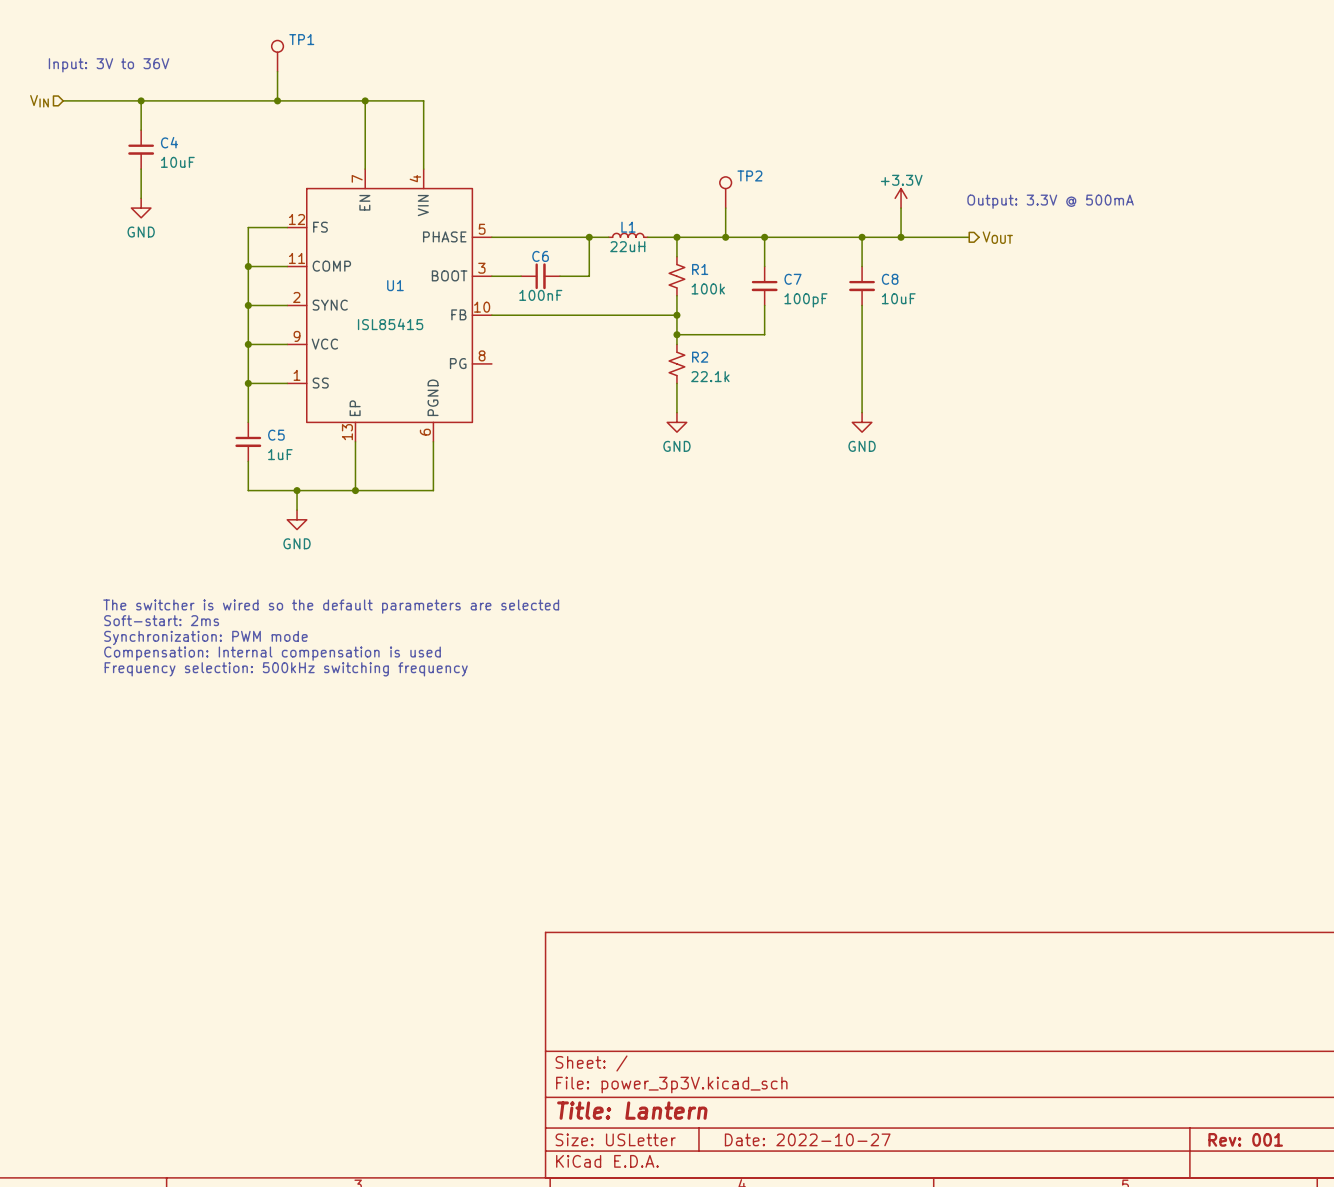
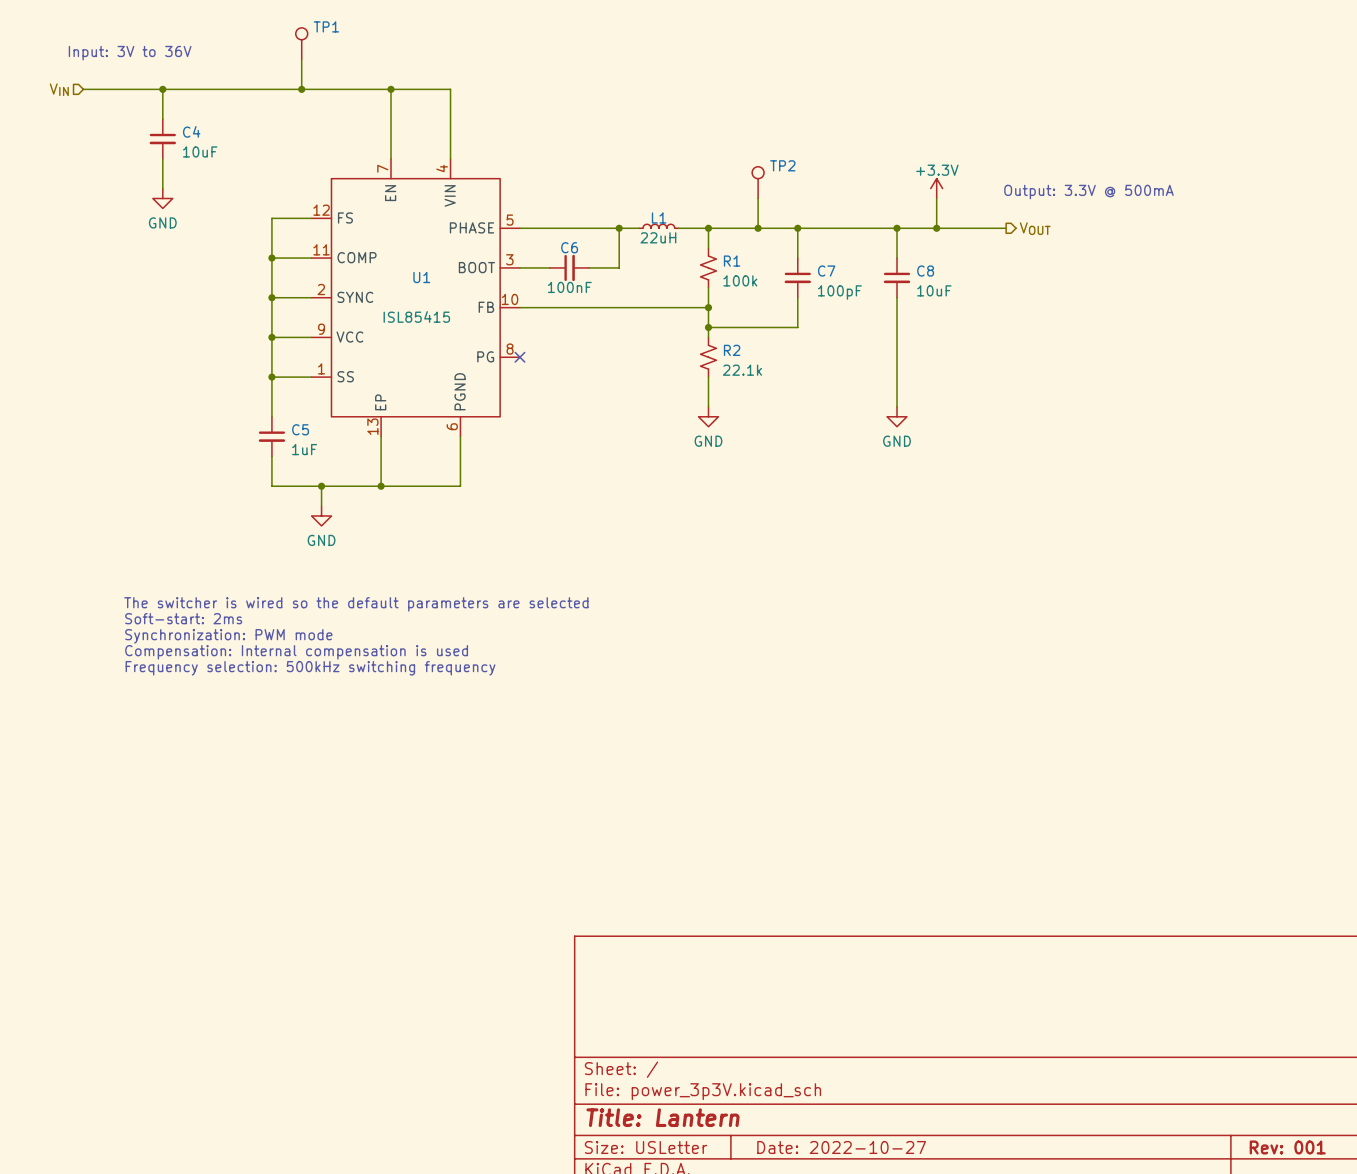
no-connect mark: none -> (519, 357)

